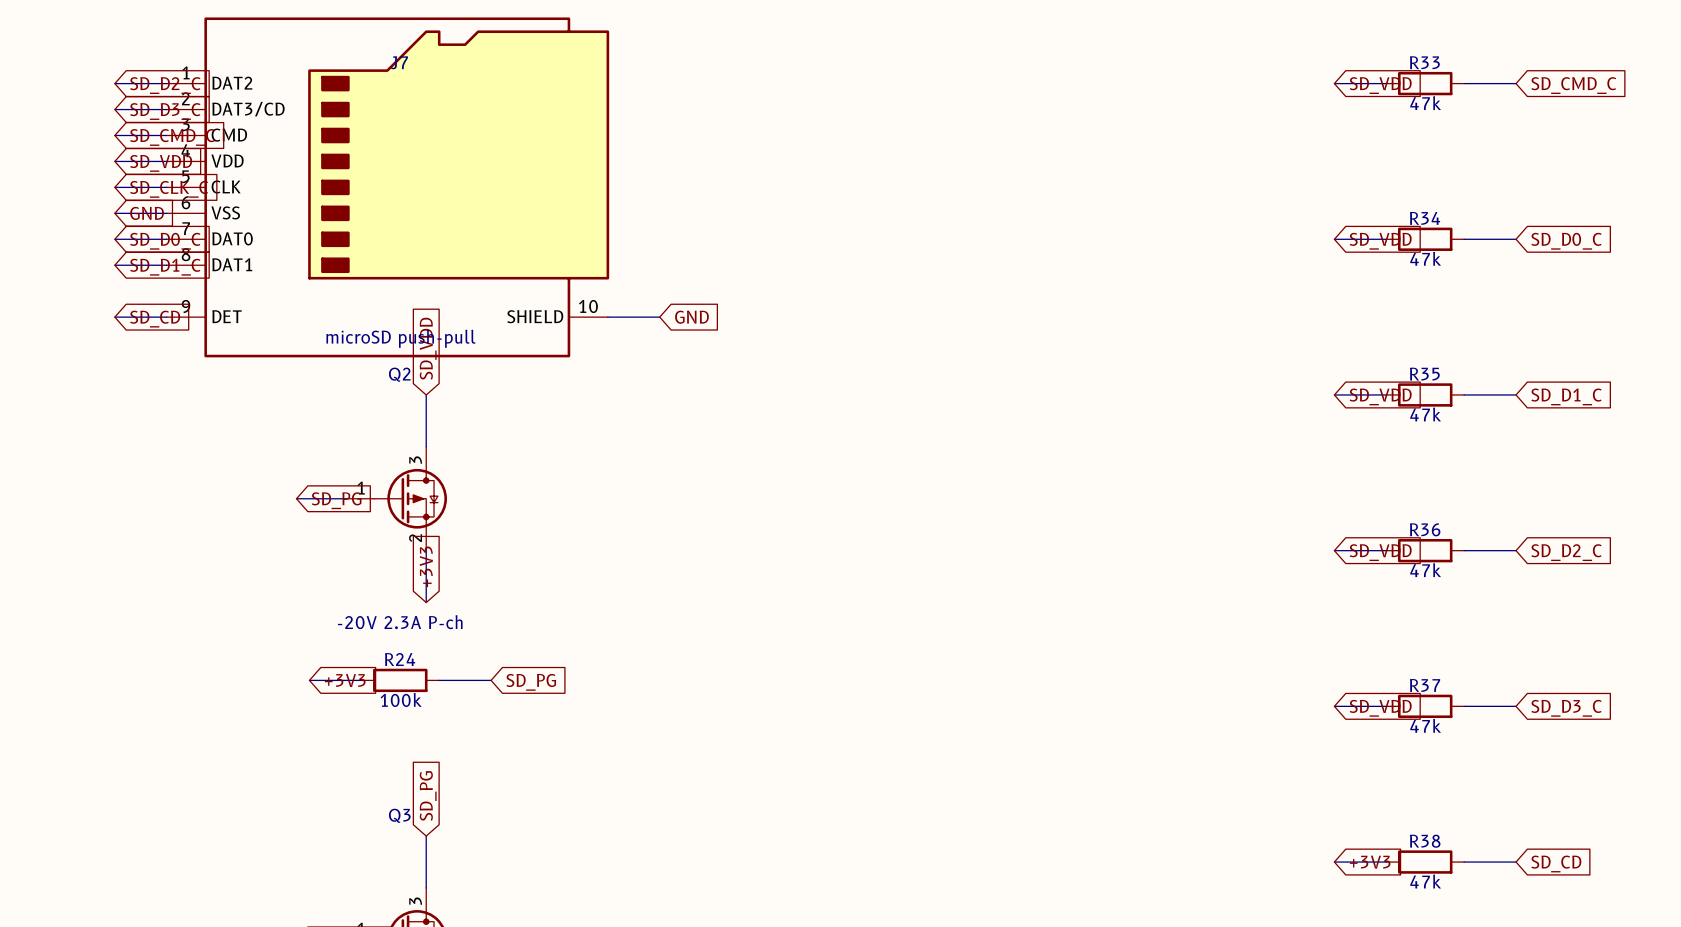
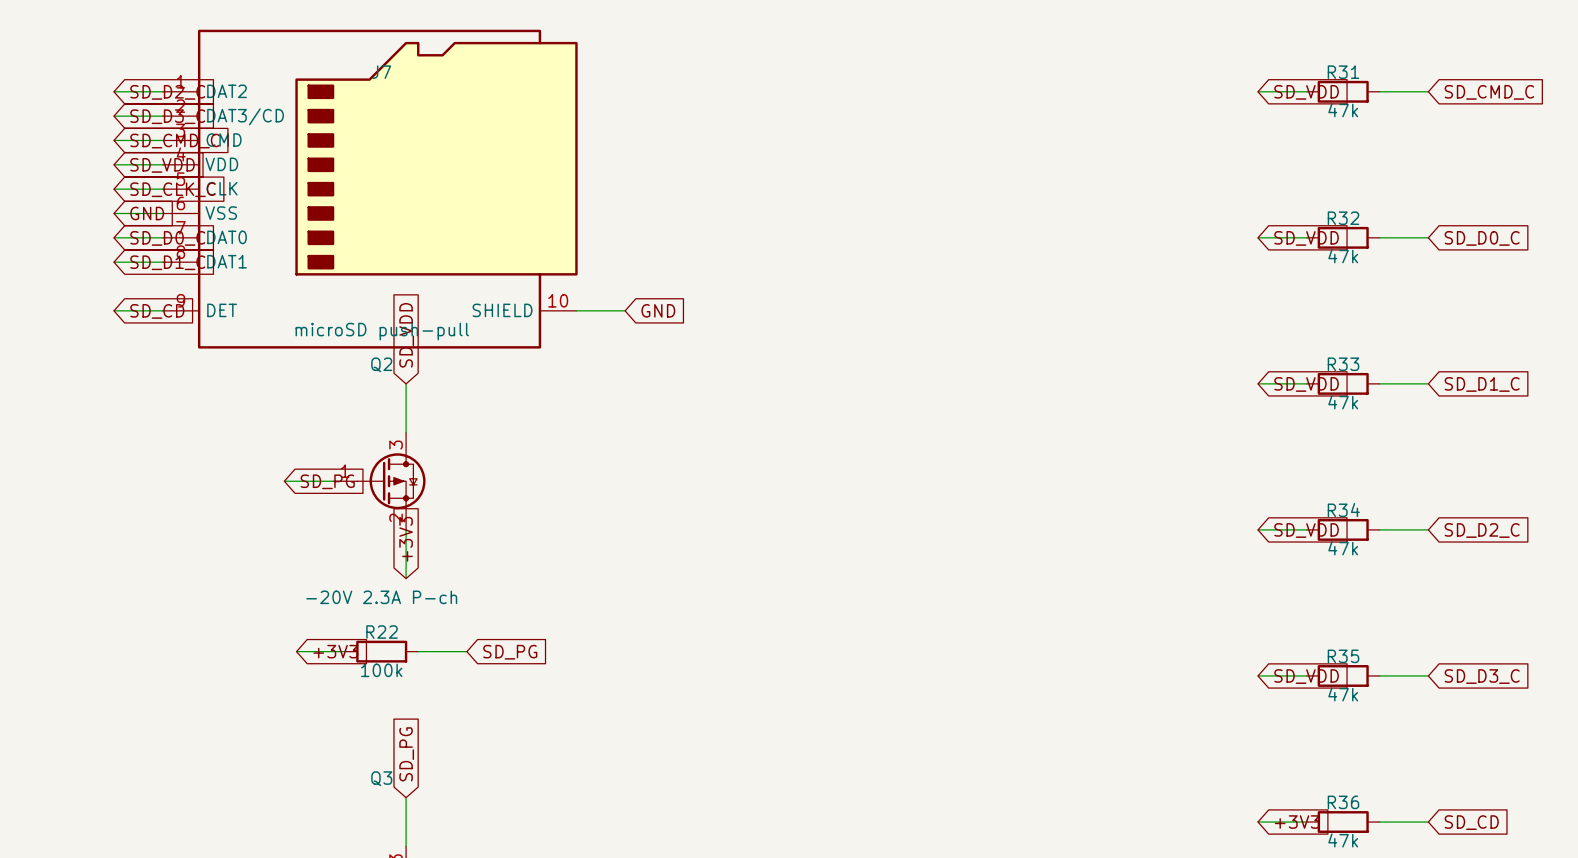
R33 name: R33 (1424, 62) -> R31 (1343, 72)
R34 name: R34 (1425, 218) -> R32 (1343, 218)
R35 name: R35 (1424, 374) -> R33 (1343, 364)
R36 name: R36 (1425, 529) -> R34 (1343, 510)
R24 name: R24 (400, 659) -> R22 (382, 632)
R37 name: R37 (1425, 685) -> R35 (1343, 656)
R38 name: R38 (1425, 841) -> R36 (1343, 802)

